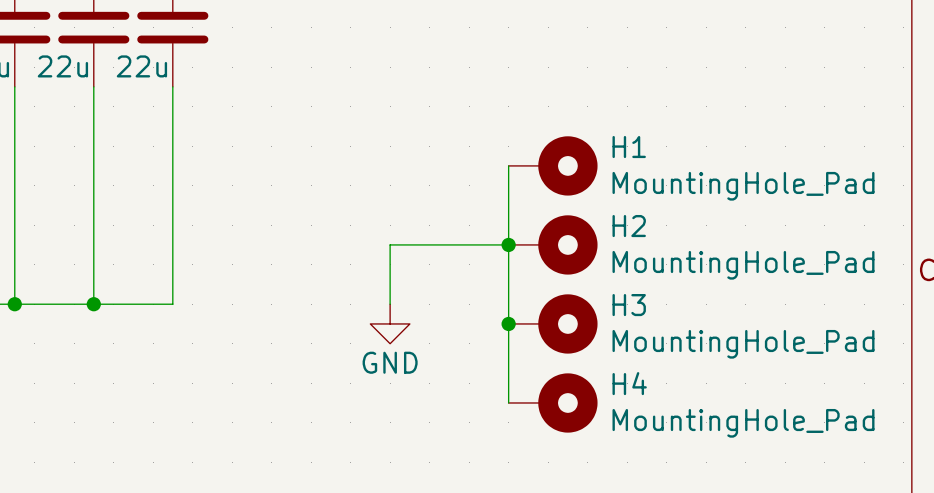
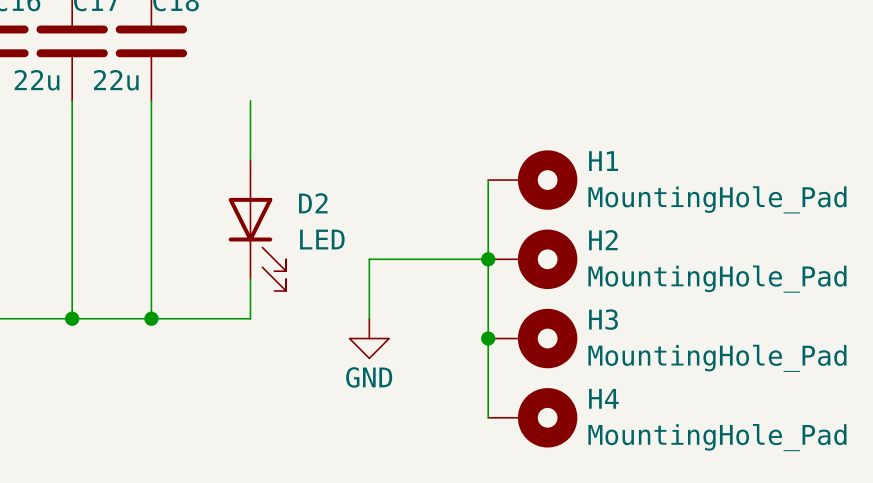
wire: none -> (250, 100) (250, 160)
D2: none -> LED (257, 225)
wire: none -> (250, 279) (250, 318) (151, 318)
junction: none -> (151, 318)

